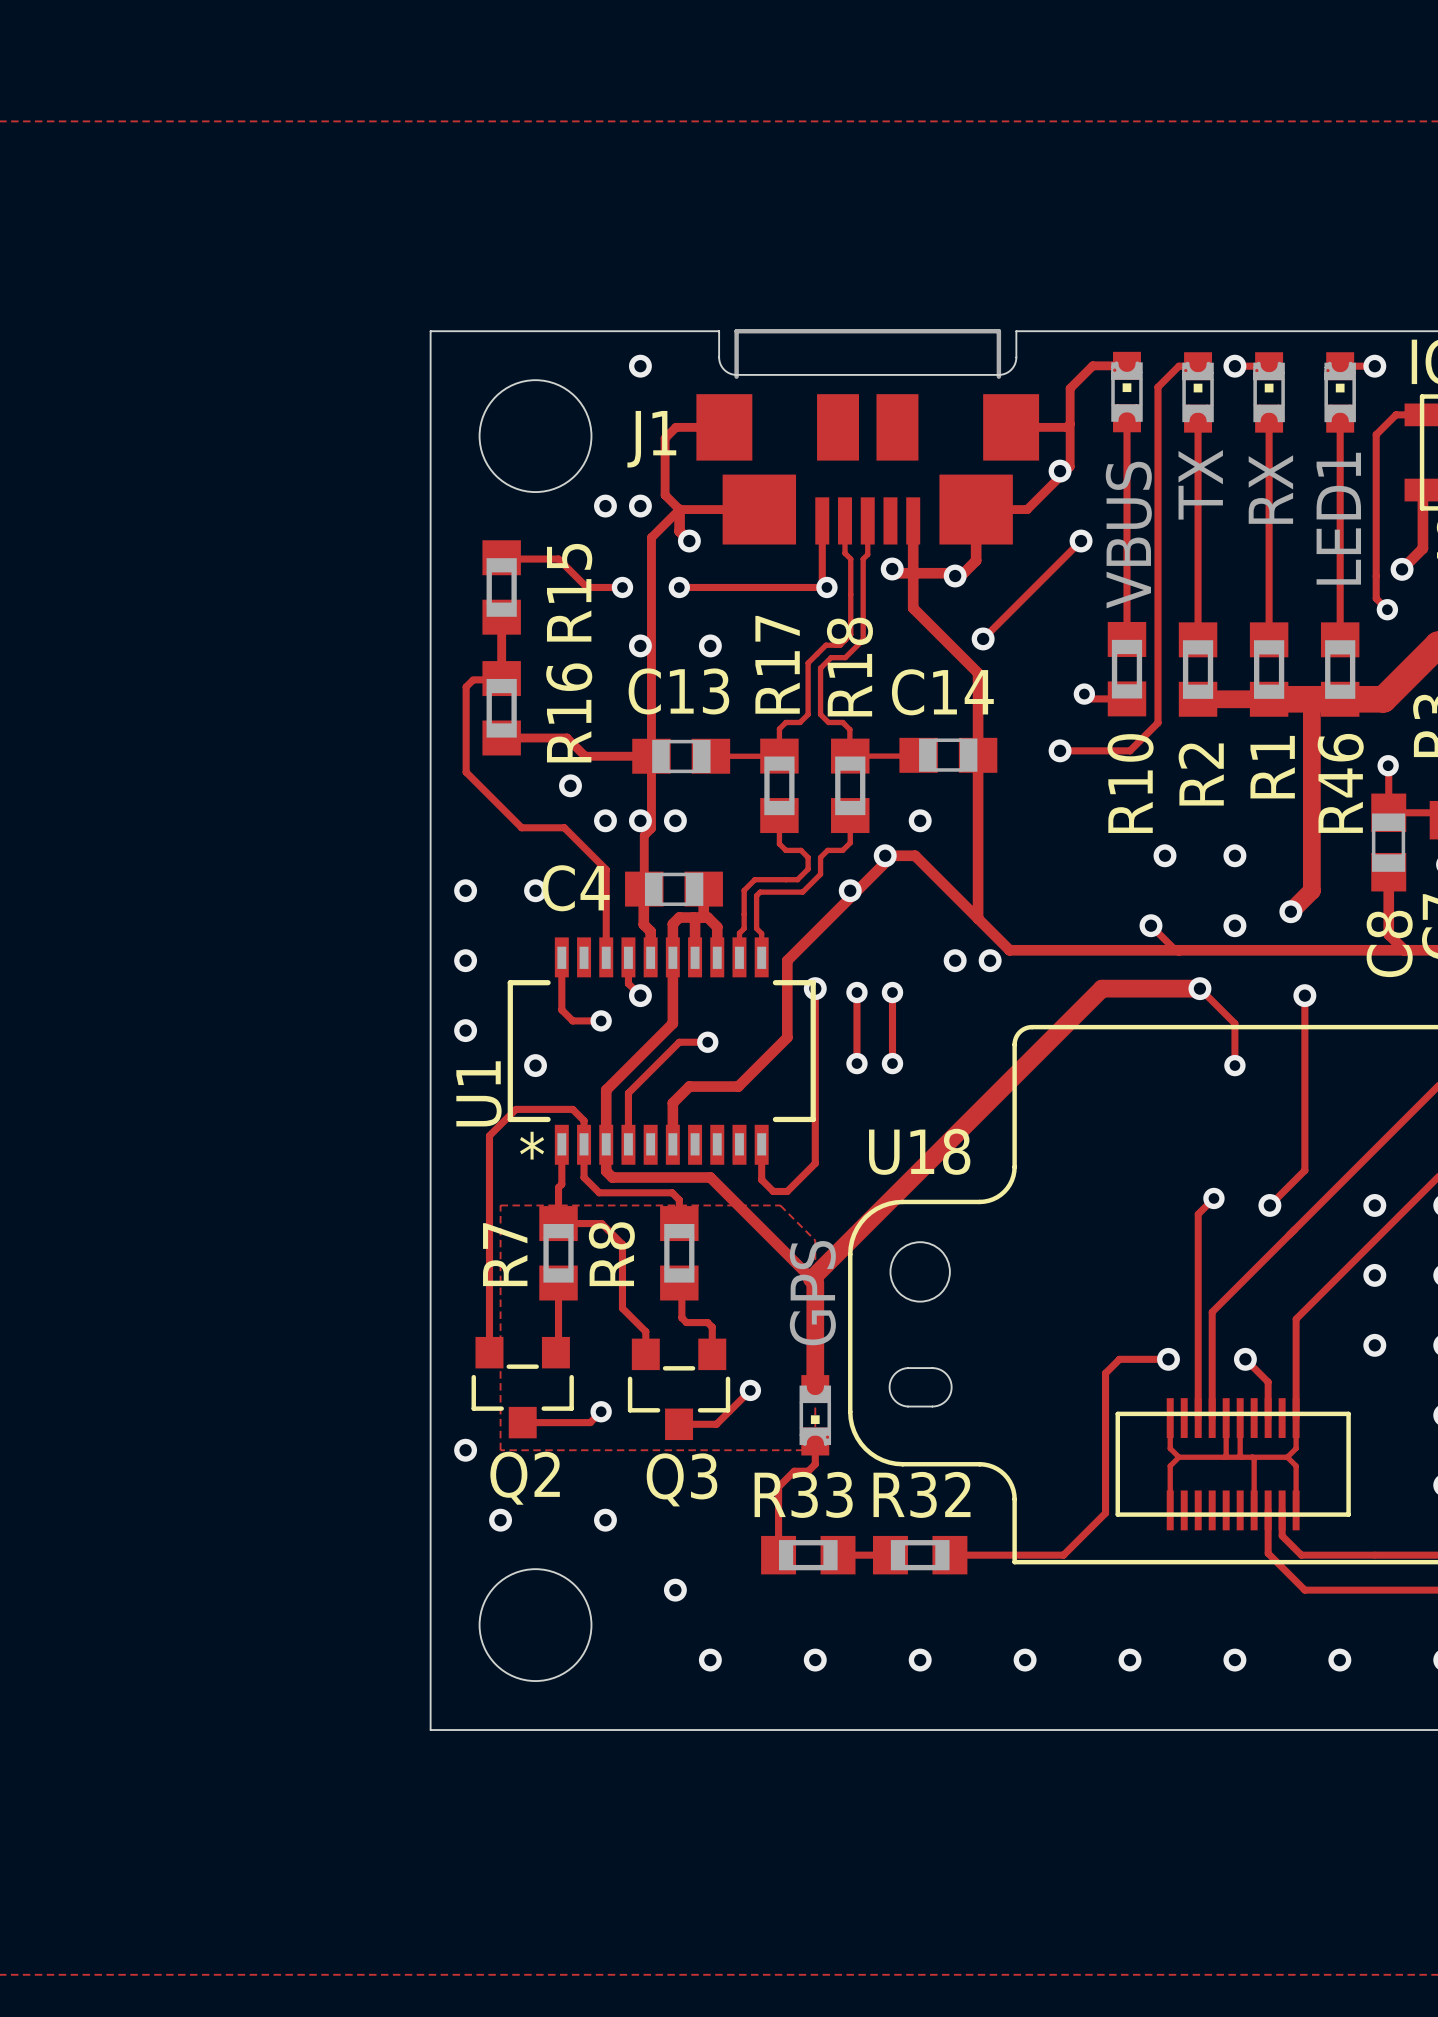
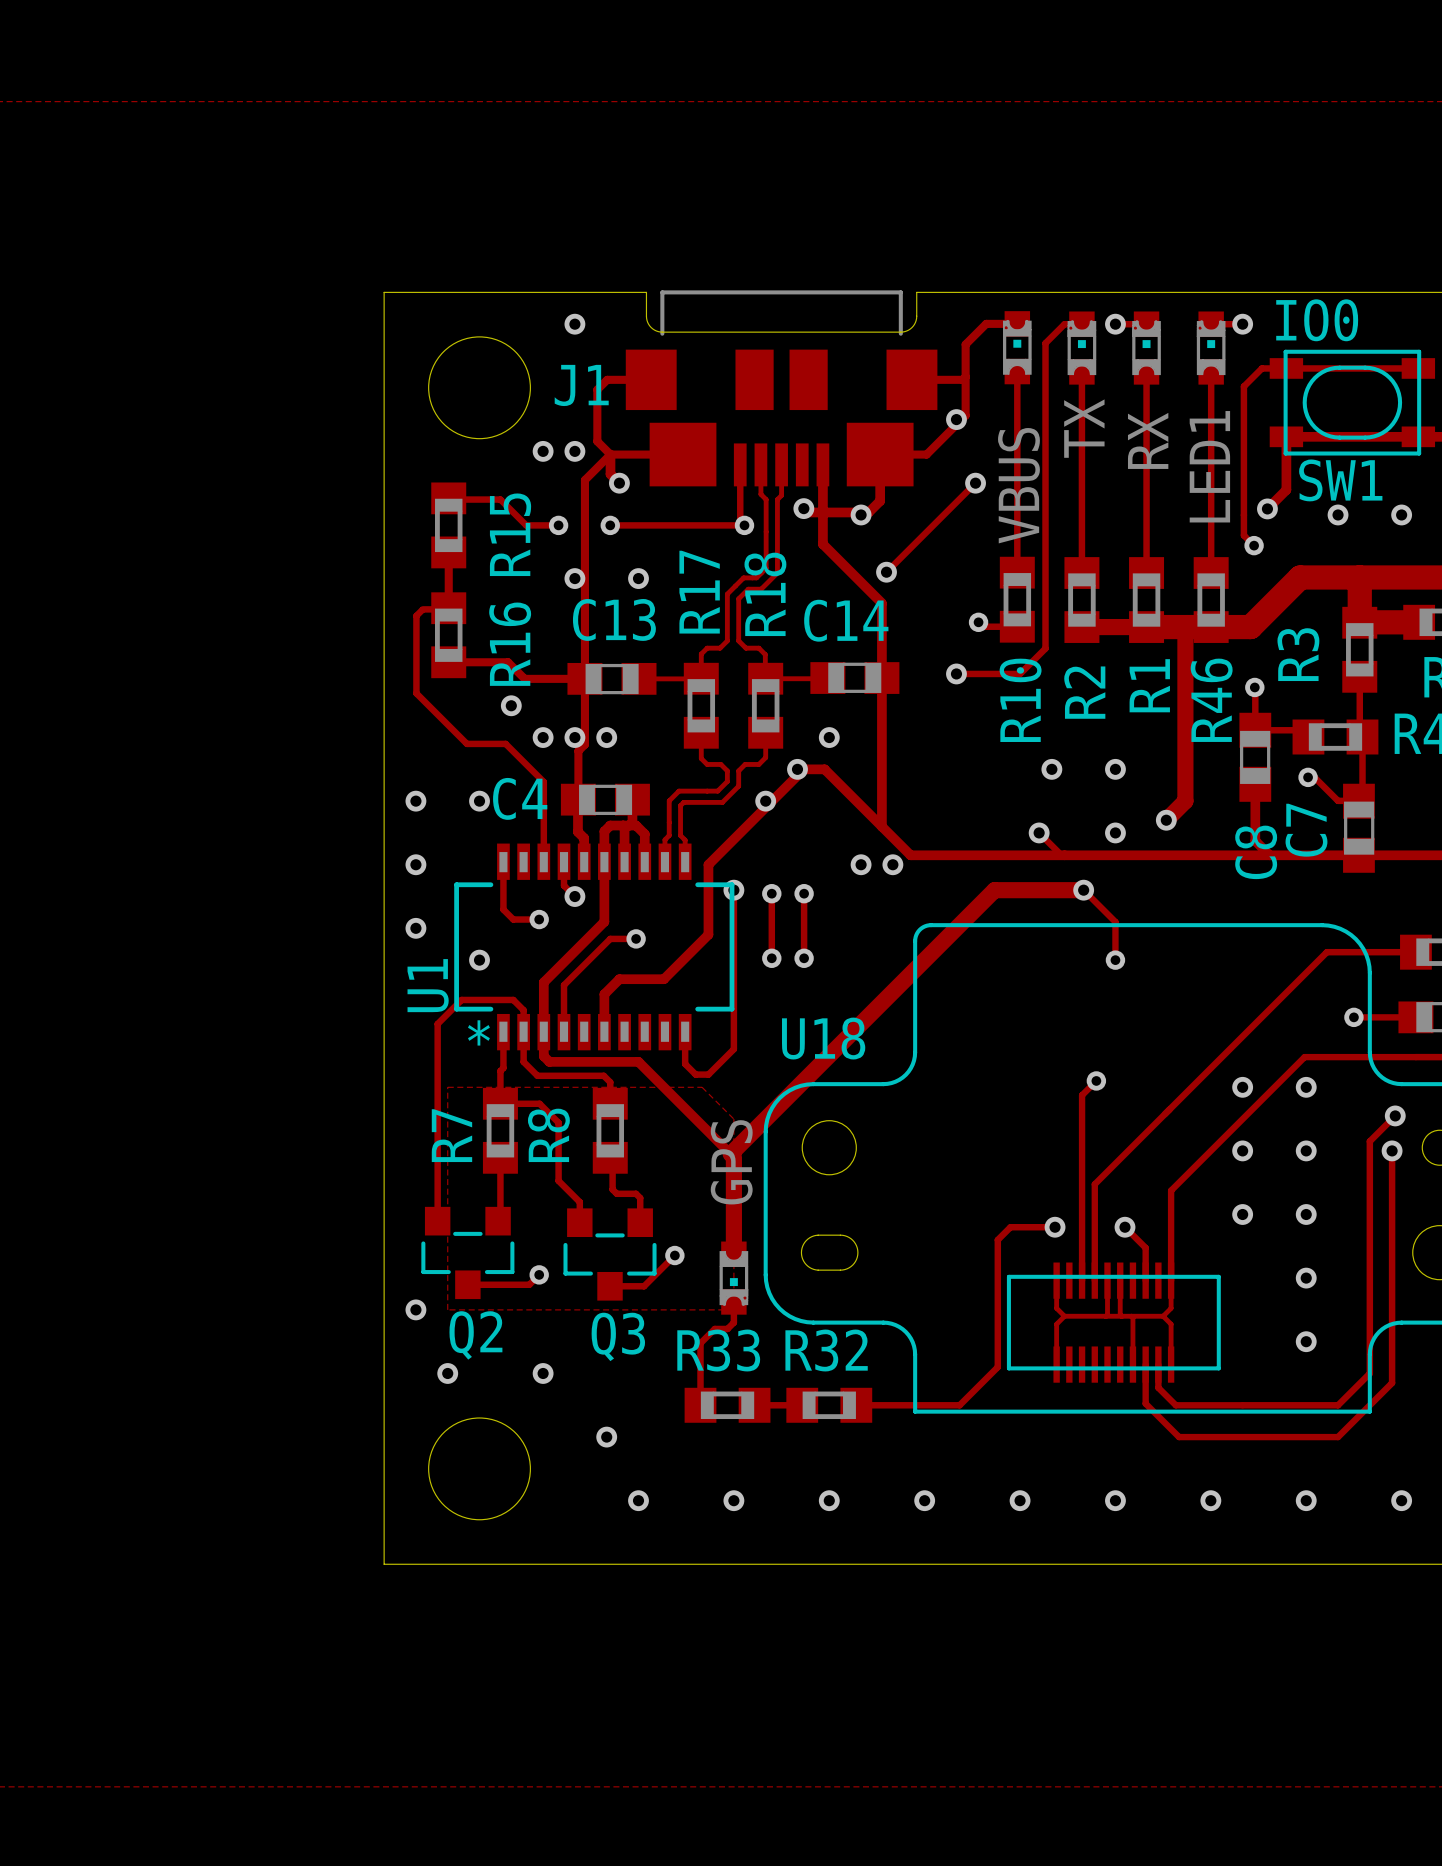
track: (1304, 995) (1304, 1170) (1269, 1205) -> none
via: (1304, 995) -> none
via: (1269, 1205) -> none

